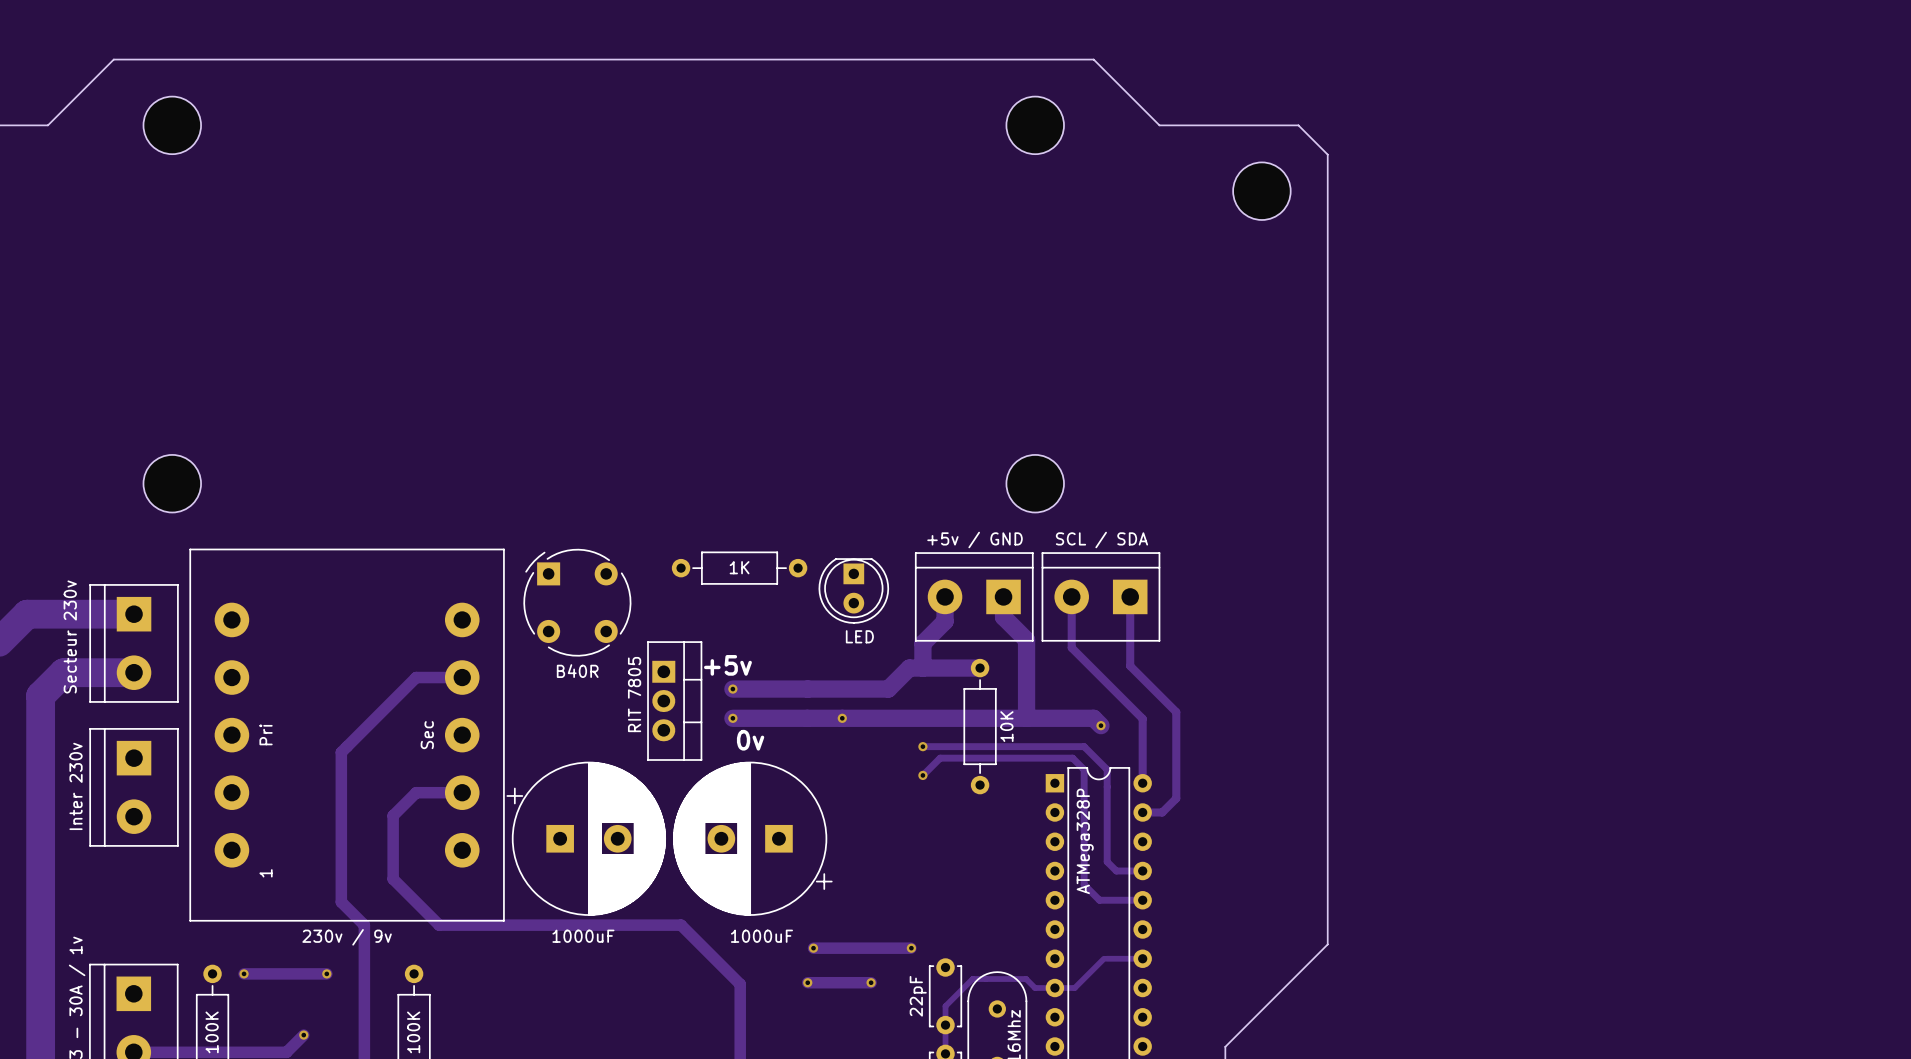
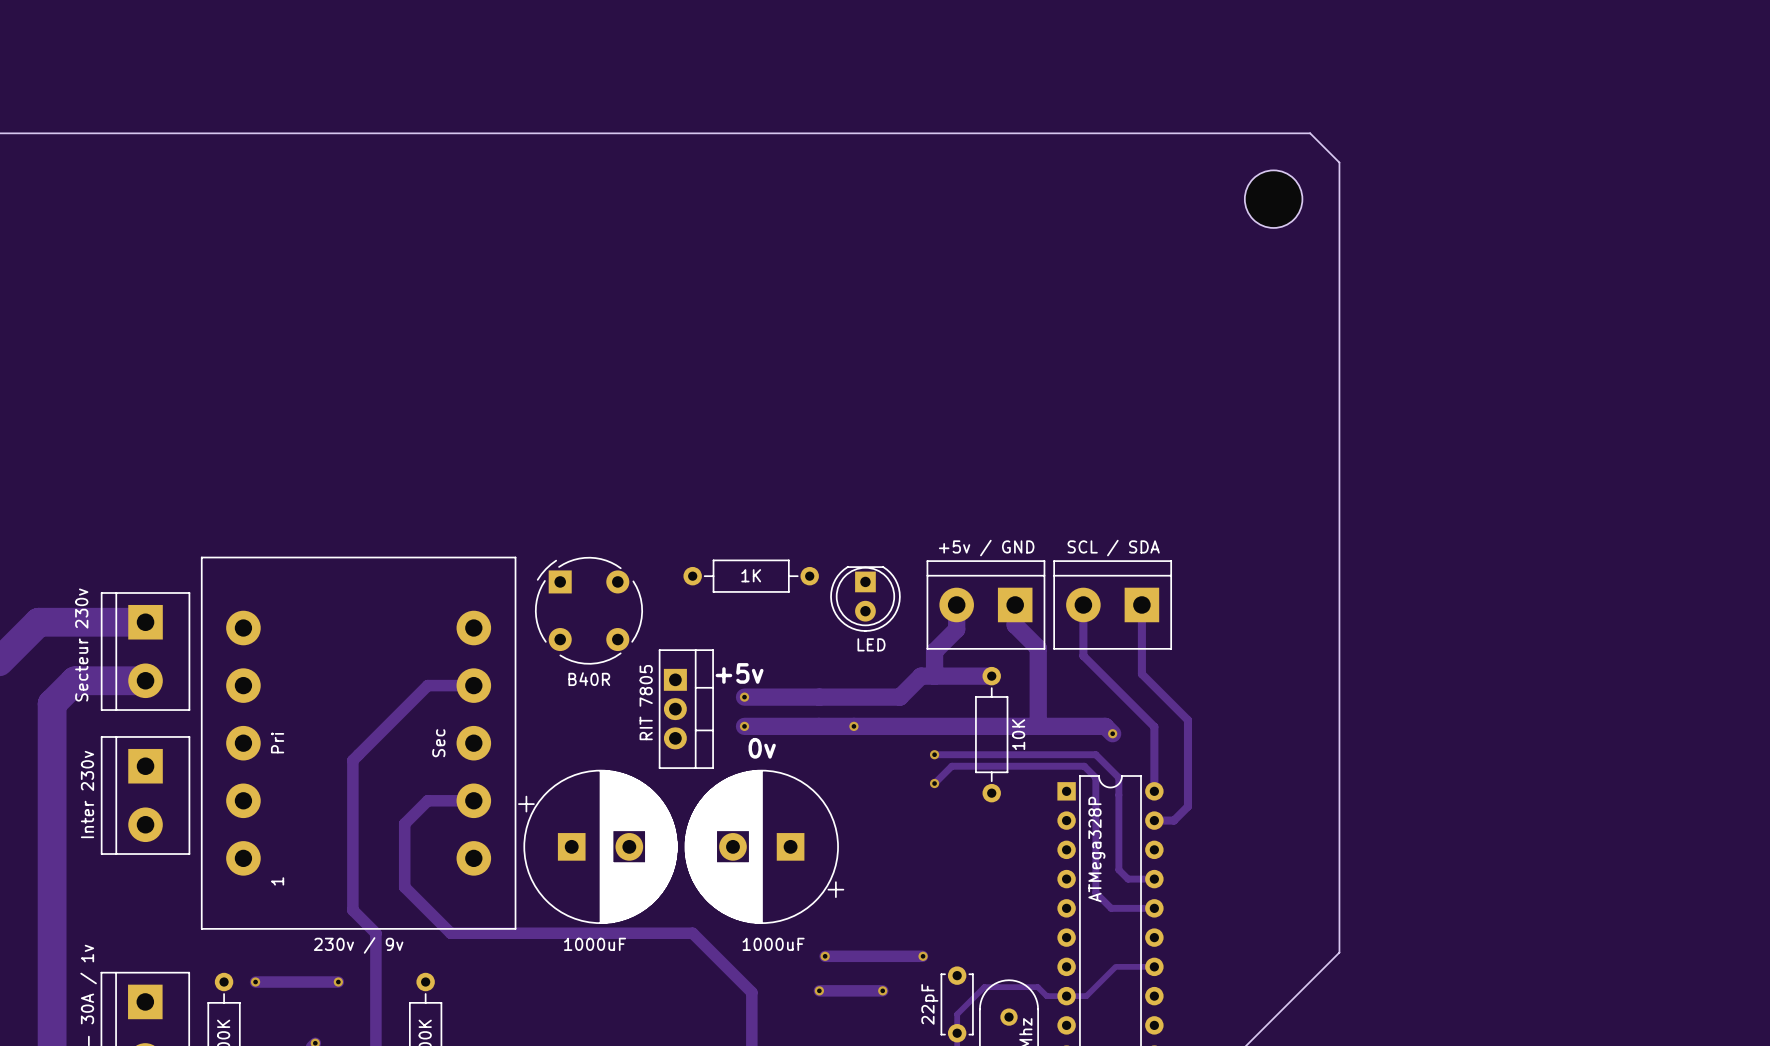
board edge: (47, 125) (113, 59) (1093, 59) (1159, 125) -> (59, 133) (1171, 133)
part: (172, 125) -> none
part: (1035, 125) -> none
part: (172, 483) -> none
part: (1035, 483) -> none

